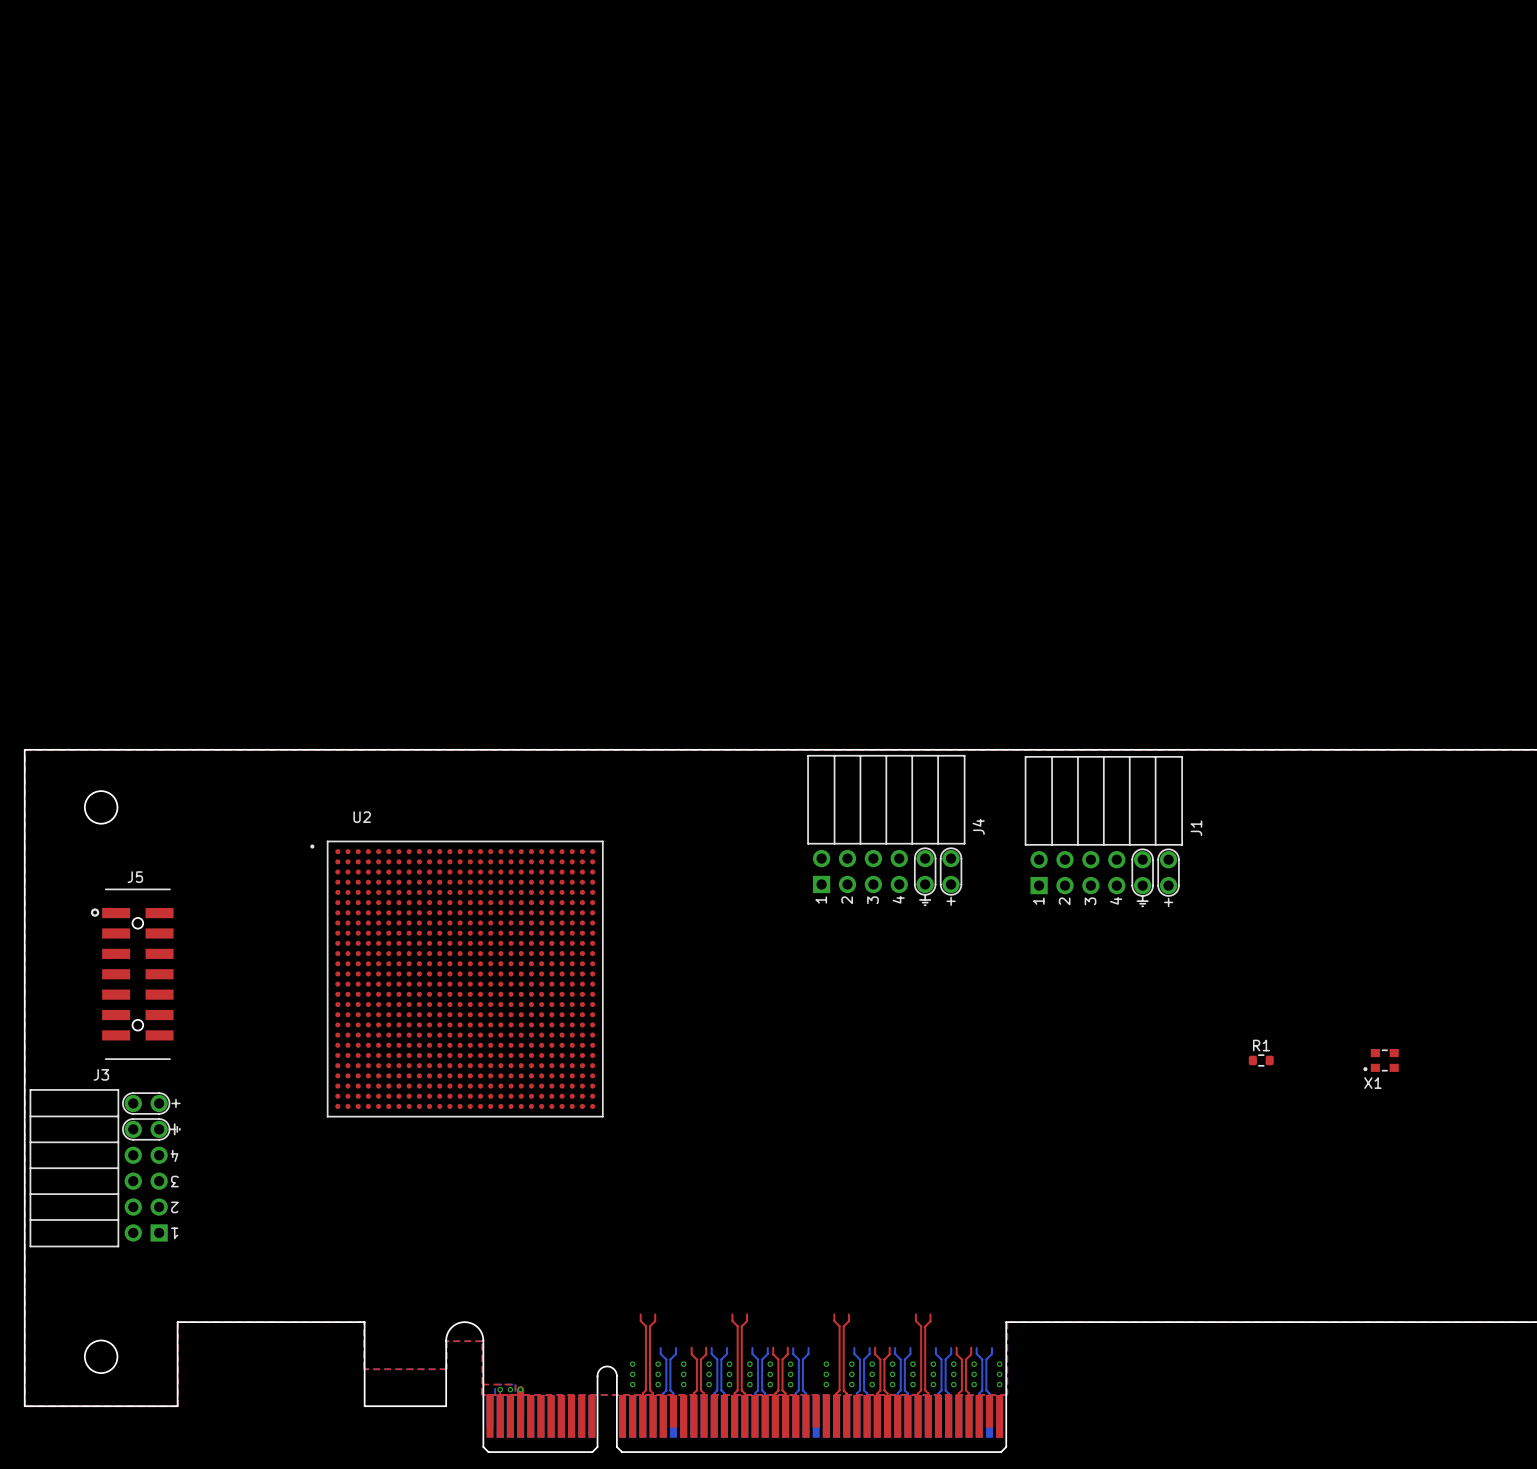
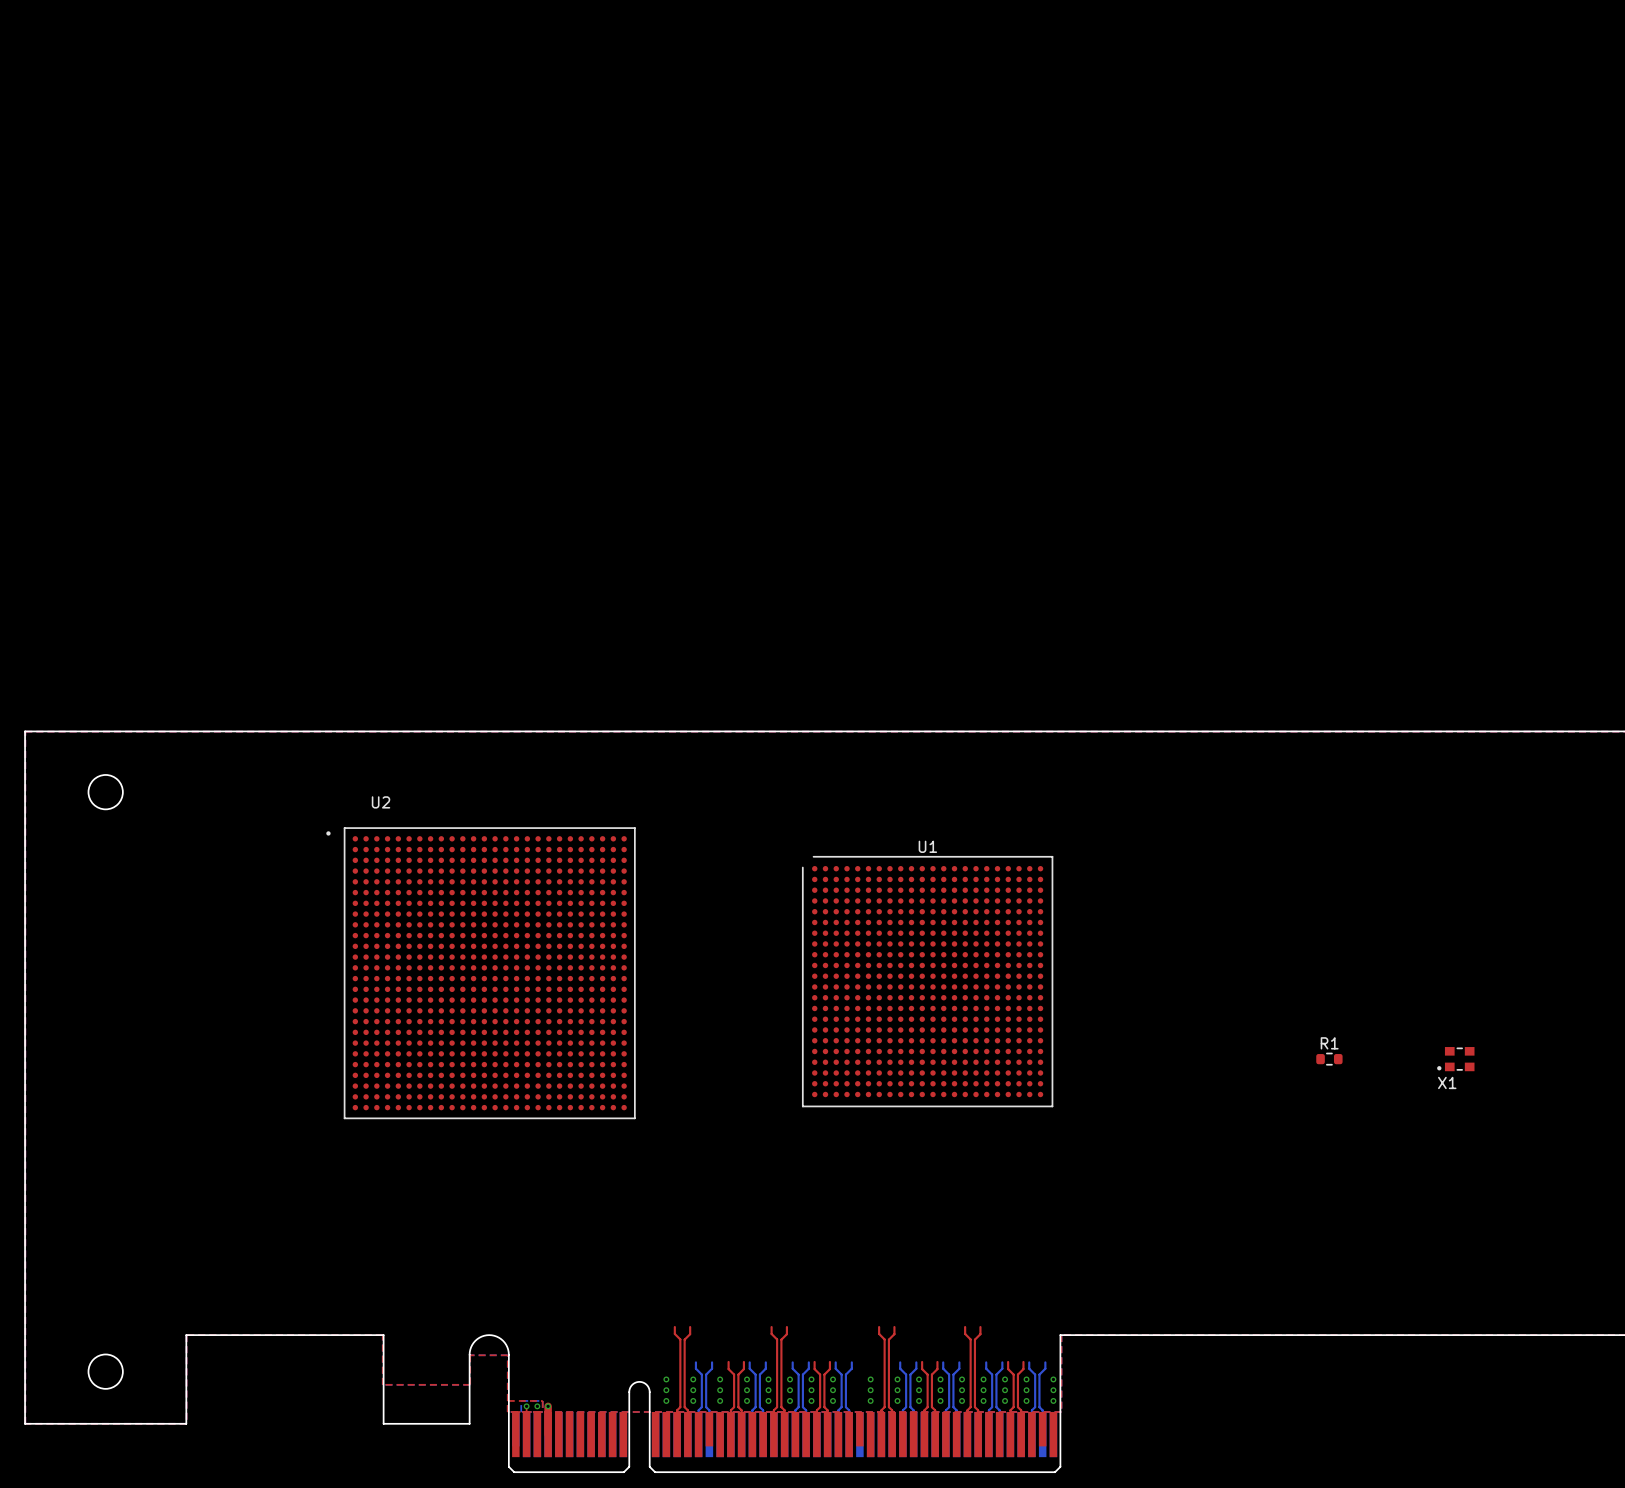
J4: (886, 830) -> none
J1: (1103, 831) -> none
J5: (132, 974) -> none
U1: none -> (927, 981)
J3: (105, 1168) -> none

